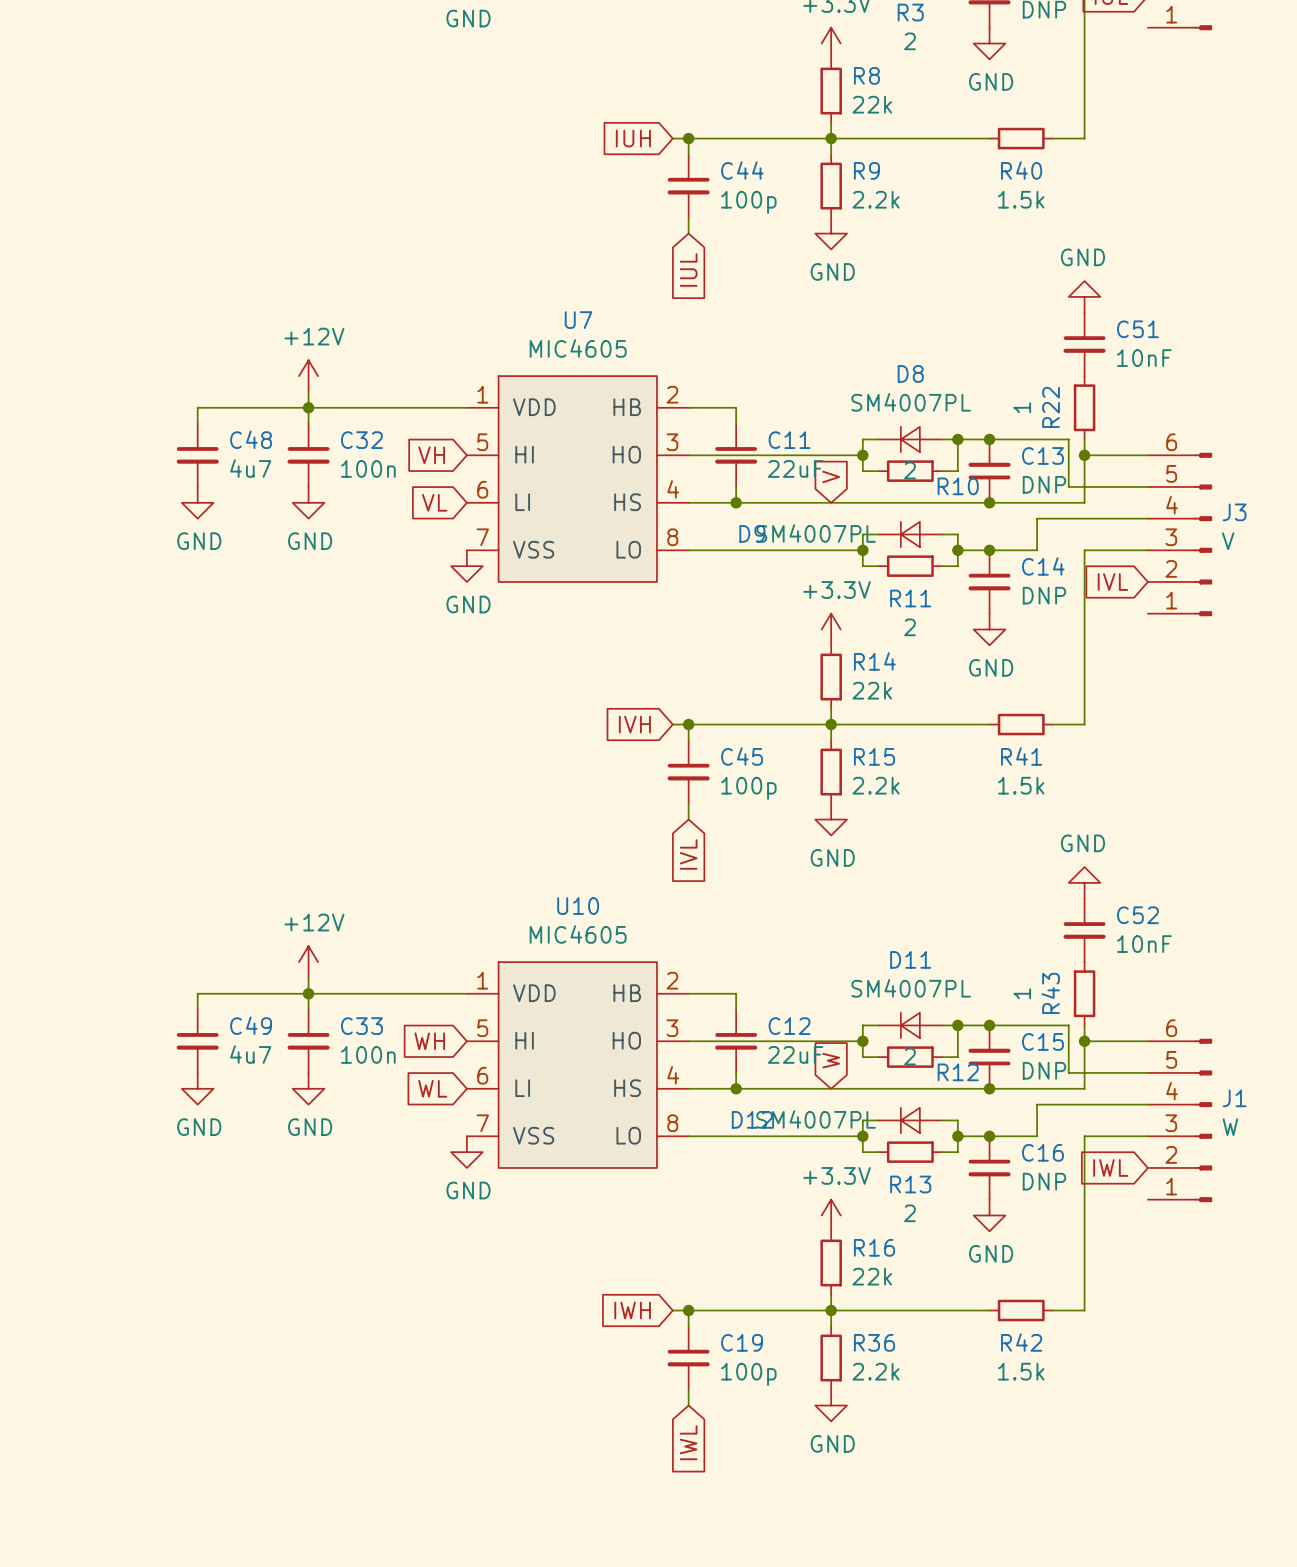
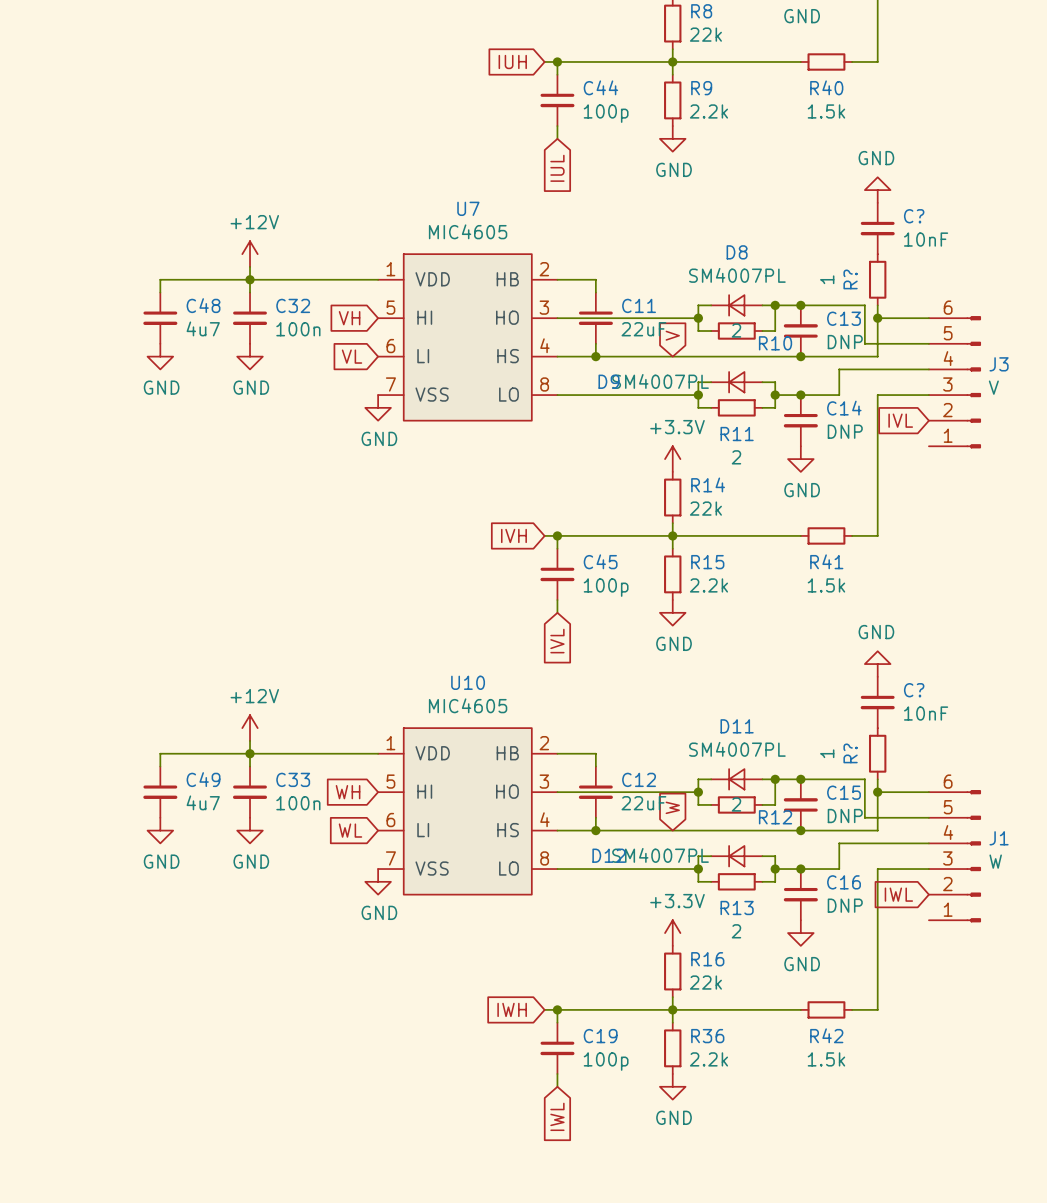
C51 name: C51 (1137, 329) -> C? (914, 216)
R22 name: R22 (1051, 407) -> R? (850, 279)
C52 name: C52 (1137, 915) -> C? (914, 690)
R43 name: R43 (1050, 993) -> R? (850, 753)

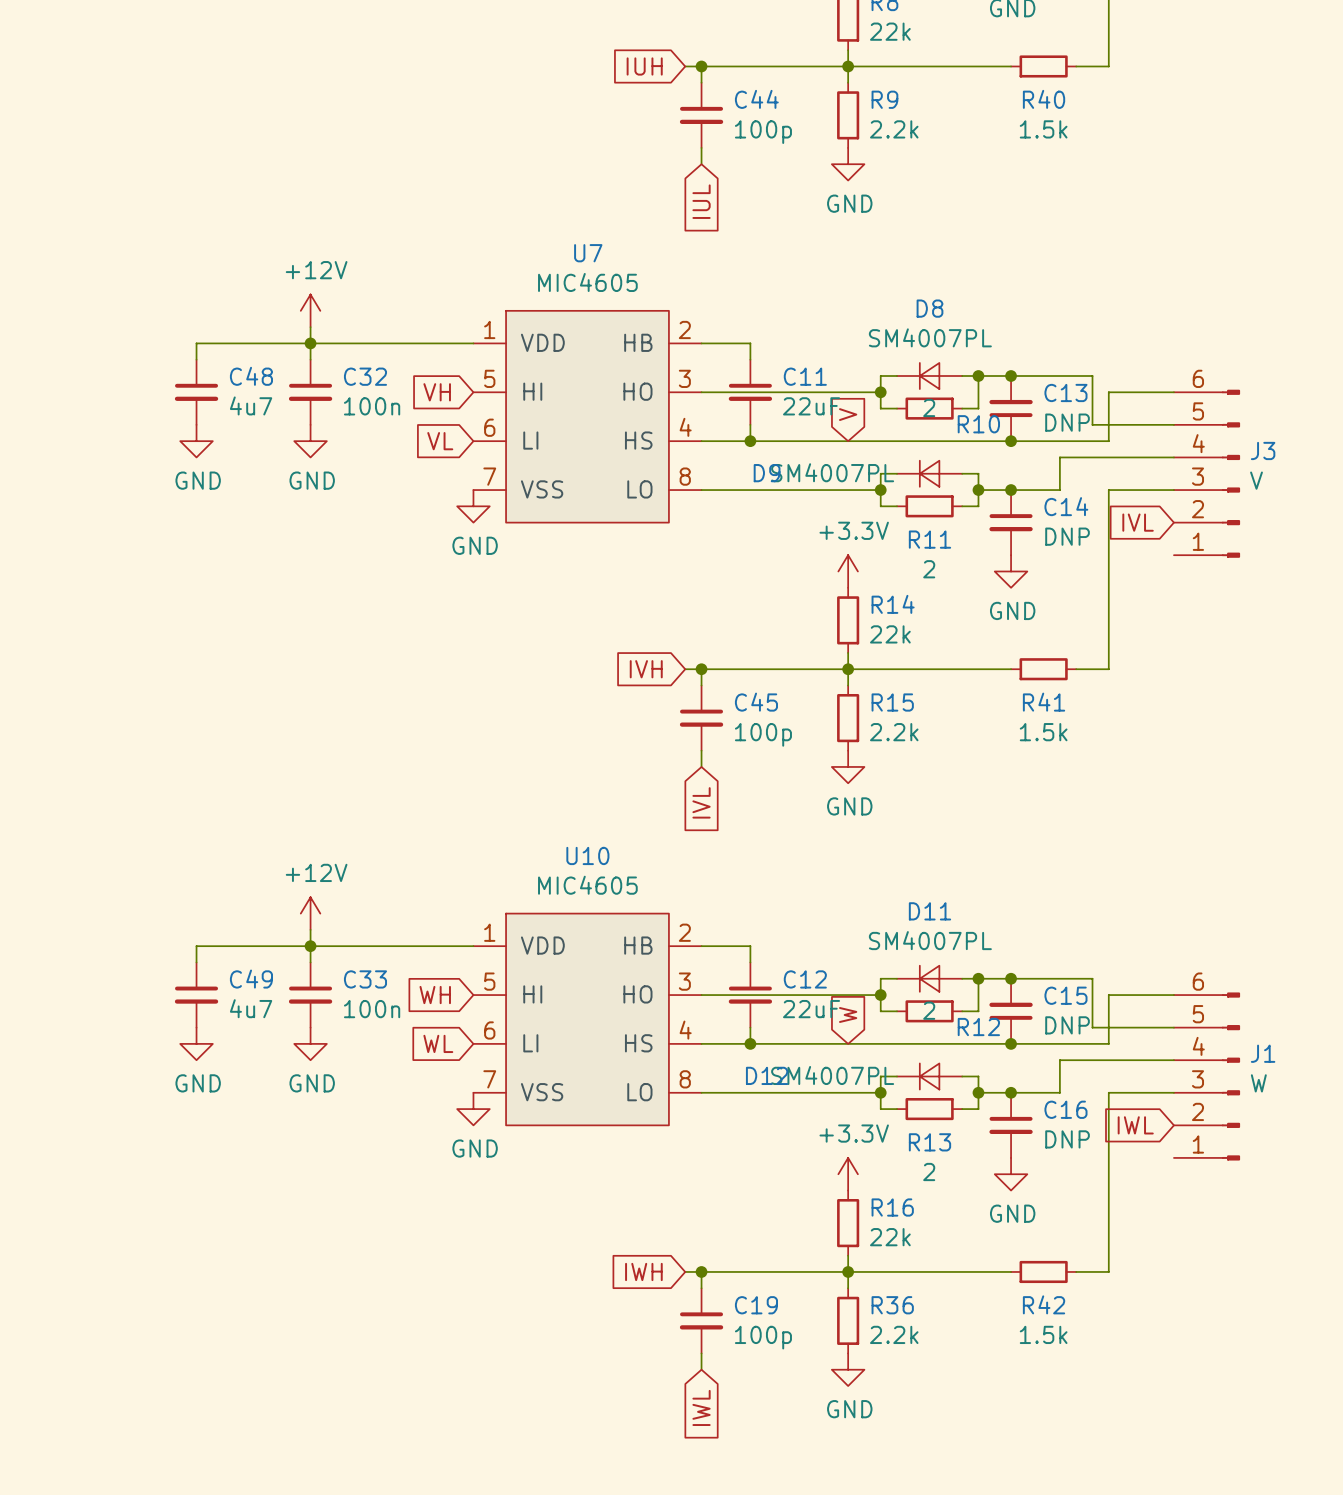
power symbol: GND (877, 190) -> none
C?: 10nF (877, 228) -> none
R?: 1 (877, 279) -> none
wire: (877, 305) (877, 318) -> none
junction: (877, 318) -> none
power symbol: GND (877, 664) -> none
C?: 10nF (877, 702) -> none
R?: 1 (877, 753) -> none
wire: (877, 779) (877, 792) -> none
junction: (877, 792) -> none

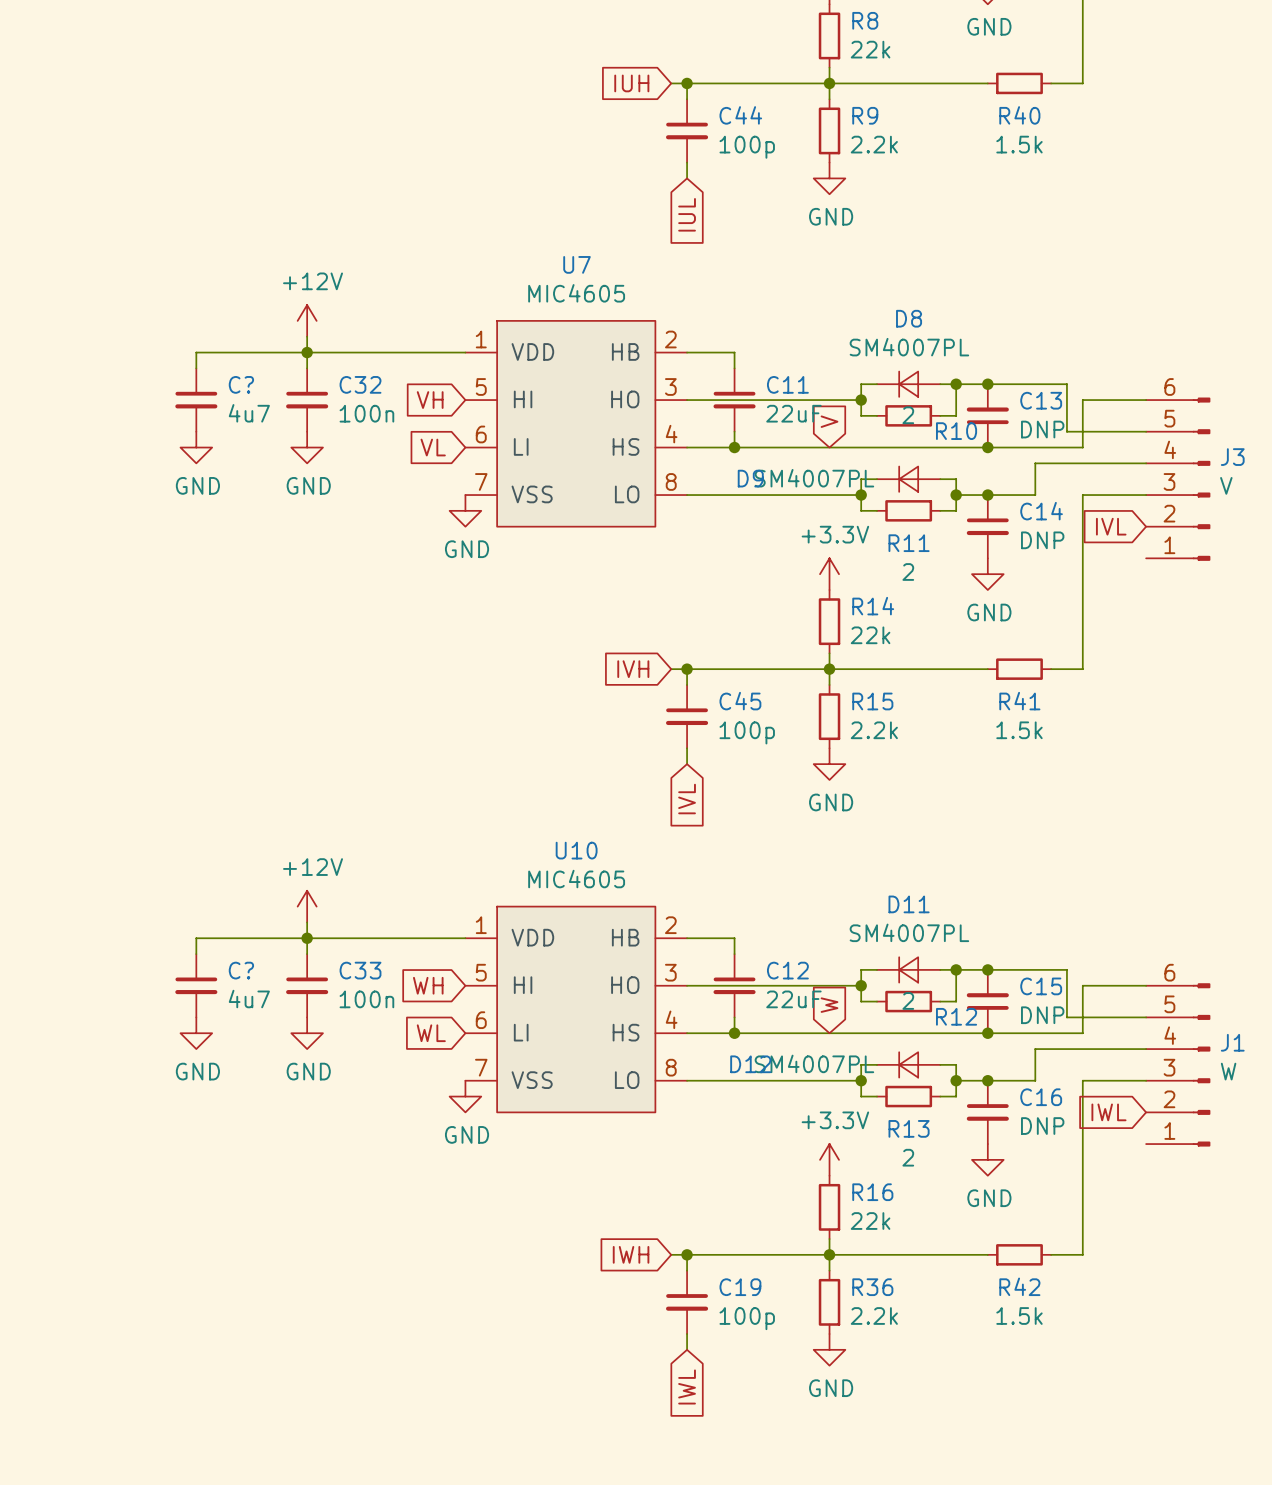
C48 name: C48 (251, 376) -> C? (241, 384)
C49 name: C49 (251, 979) -> C? (241, 970)

